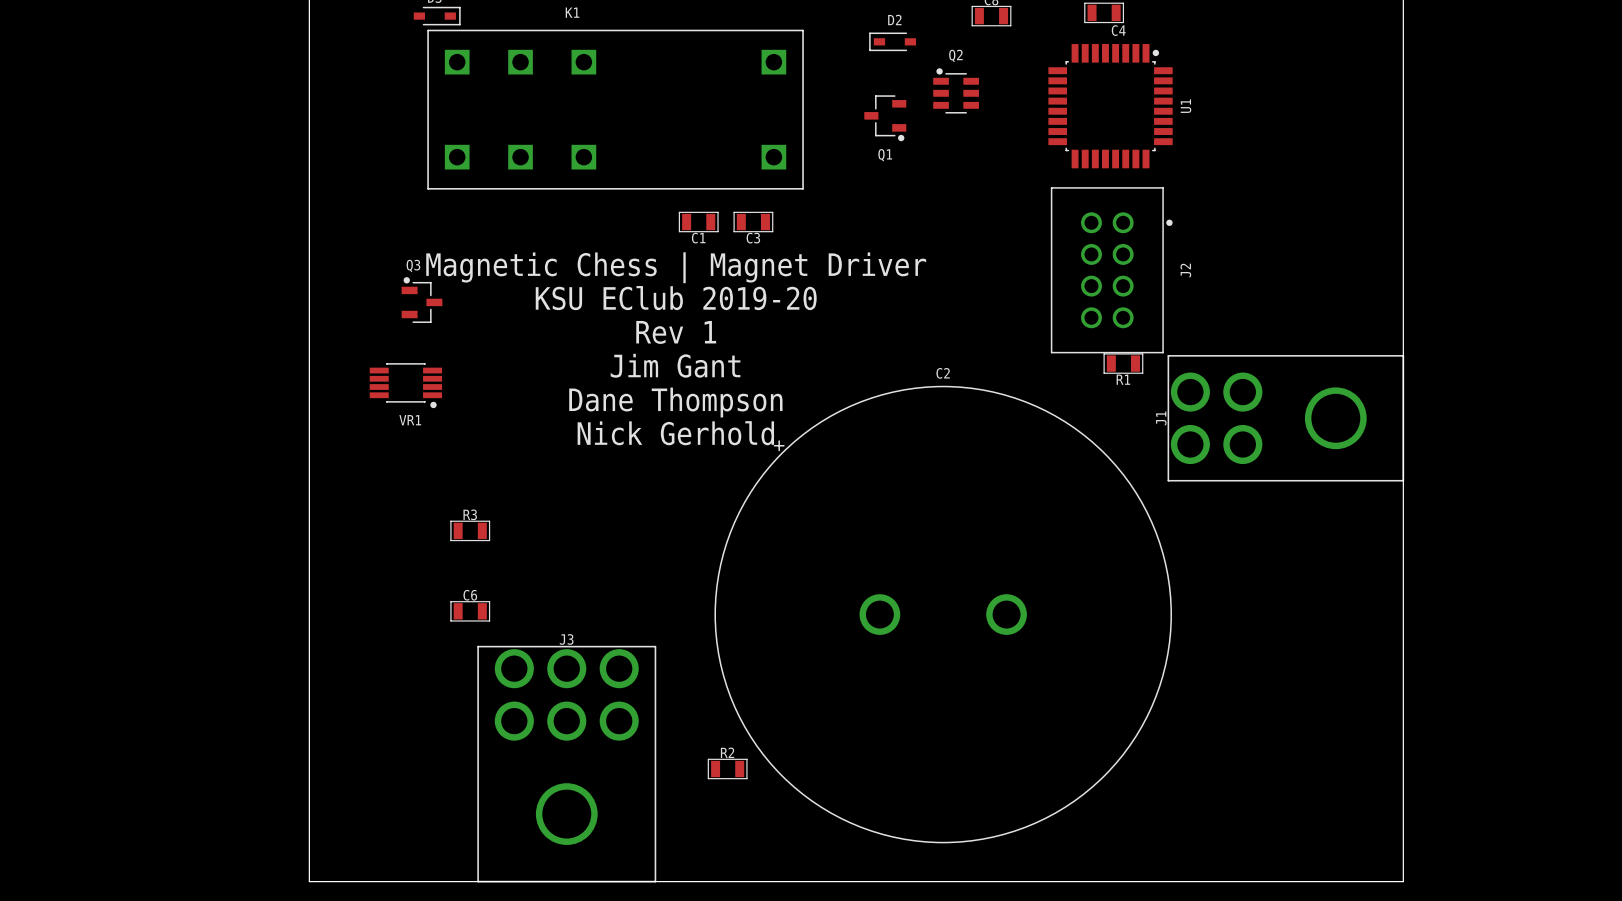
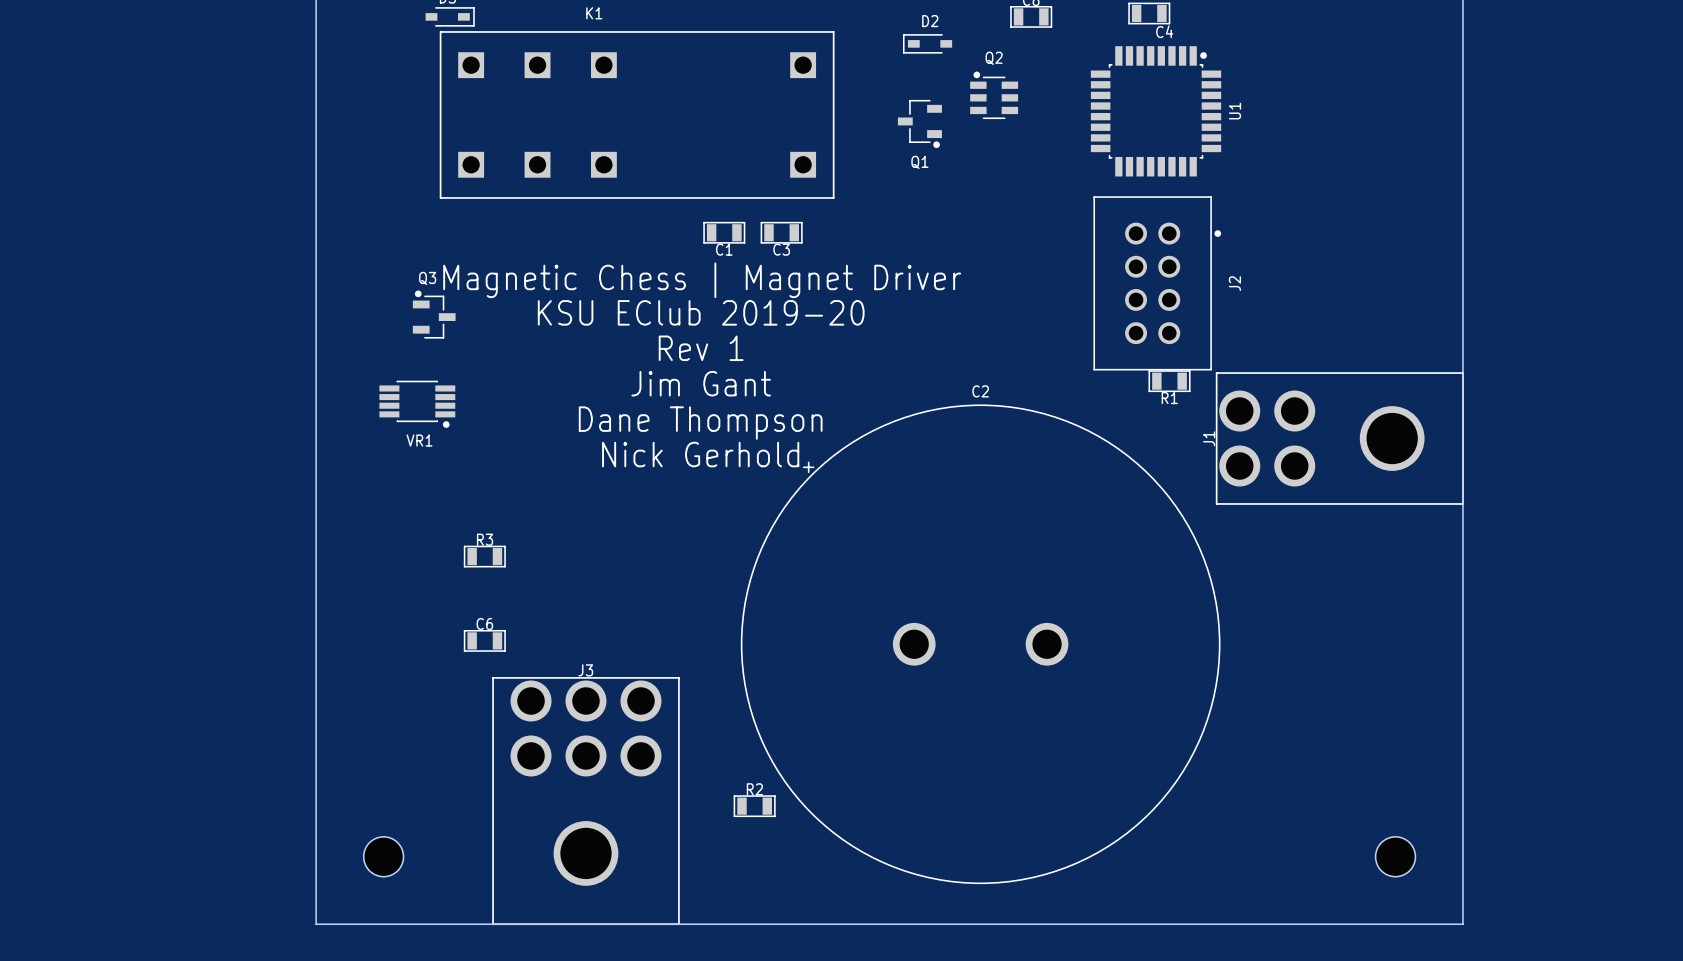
hole: none -> (383, 856)
hole: none -> (1395, 856)

